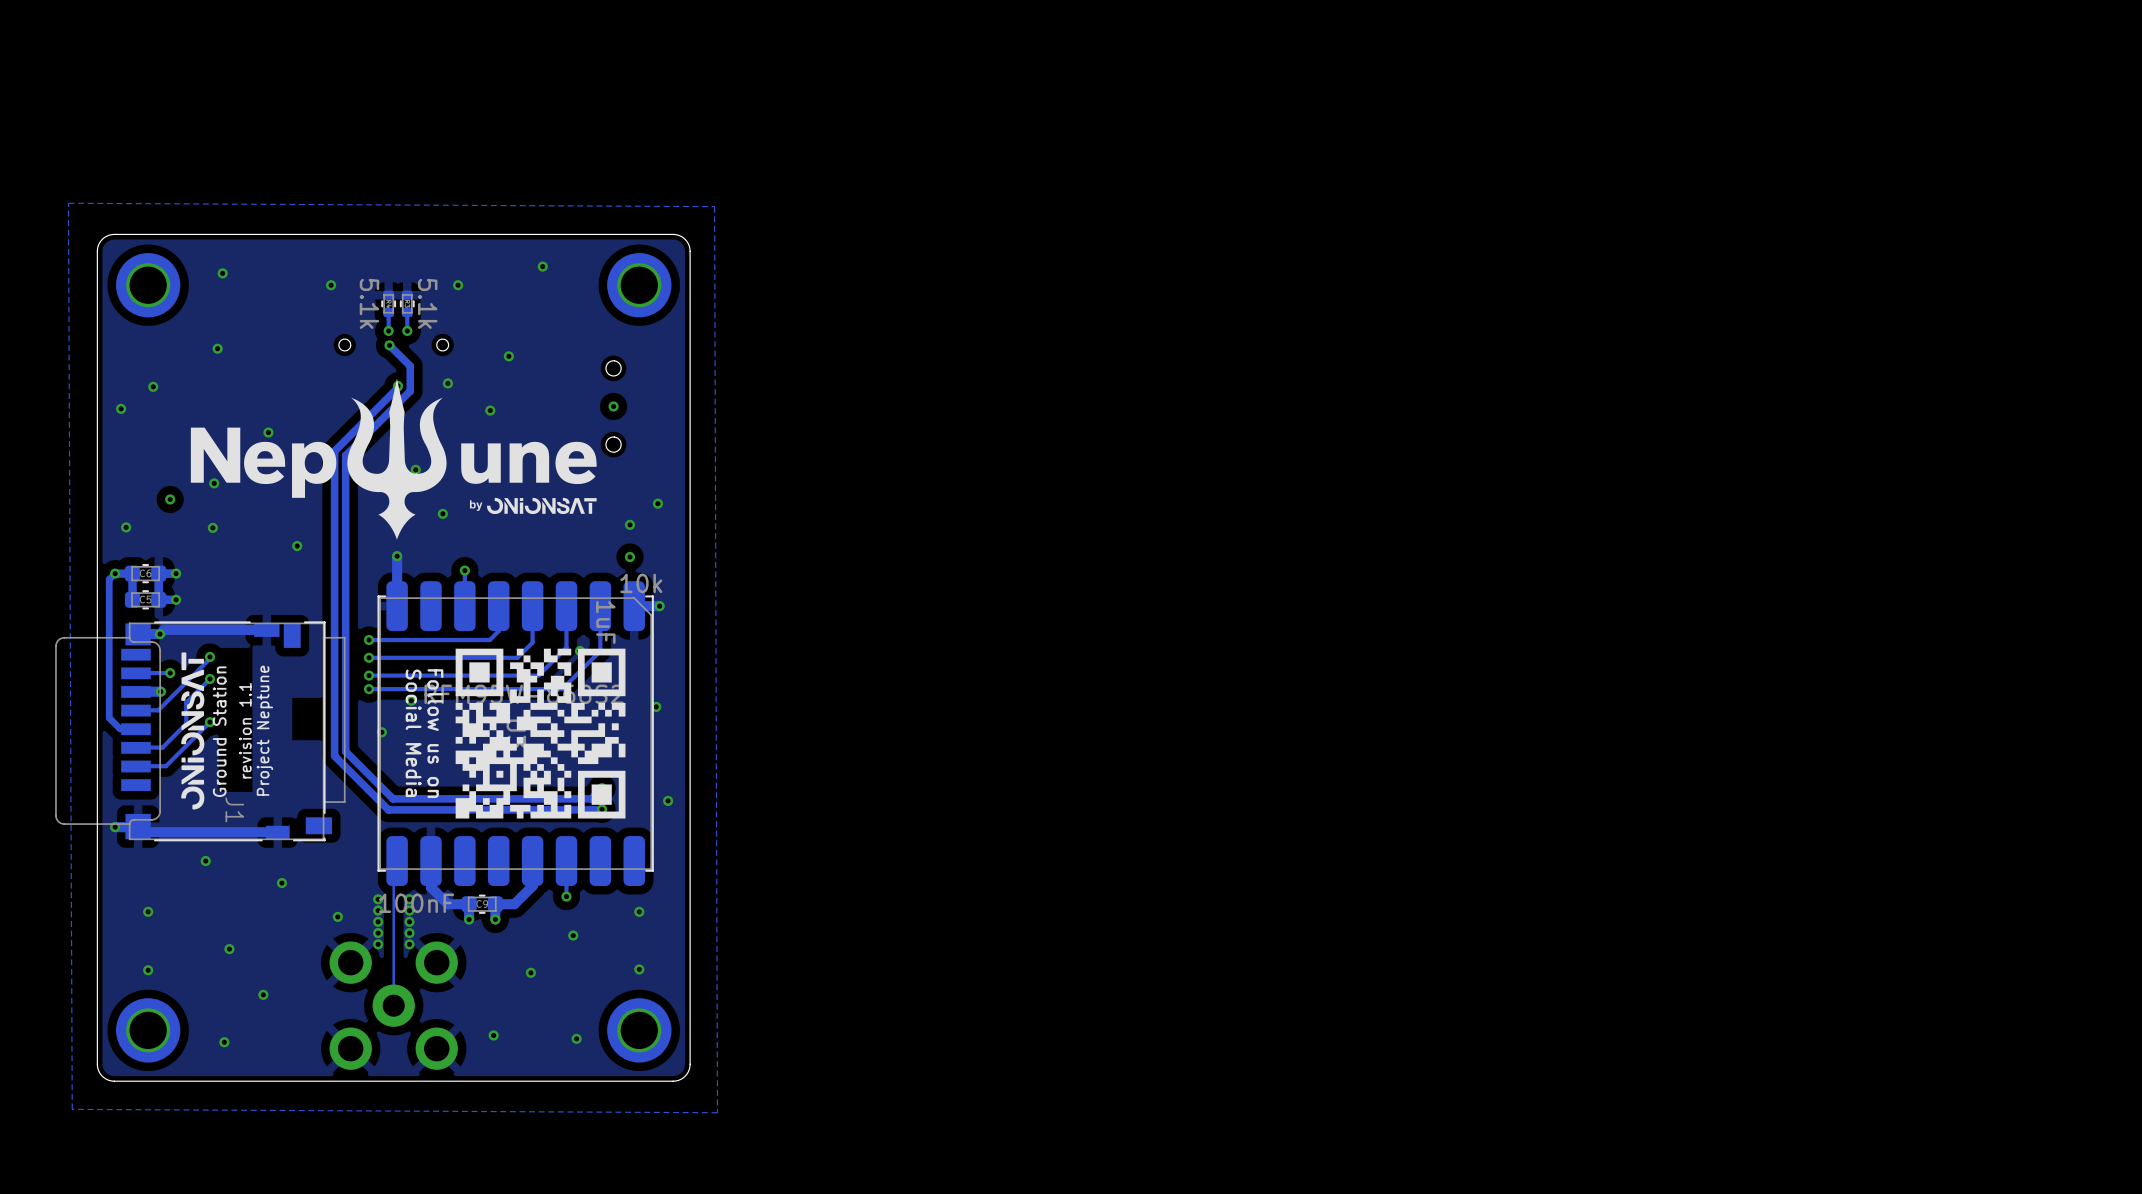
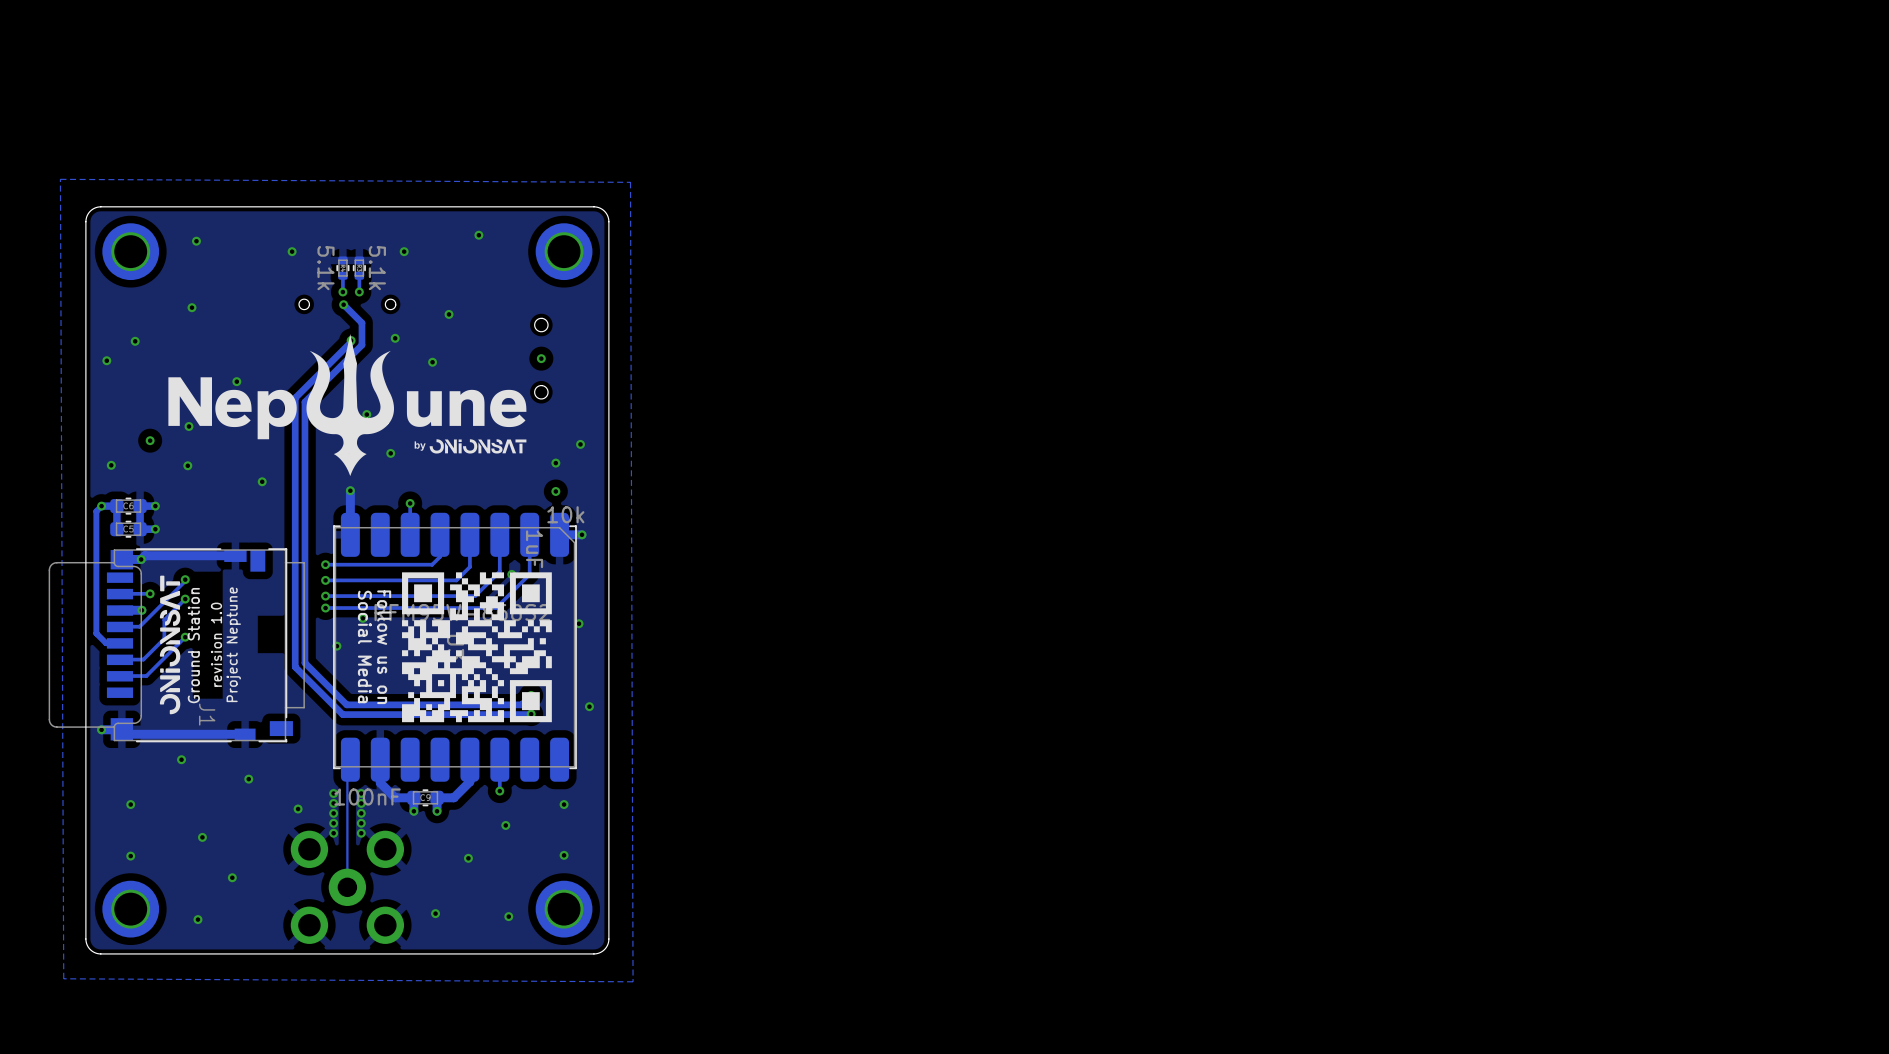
text: revision 1.1 (245, 730) -> revision 1.0 (216, 644)

